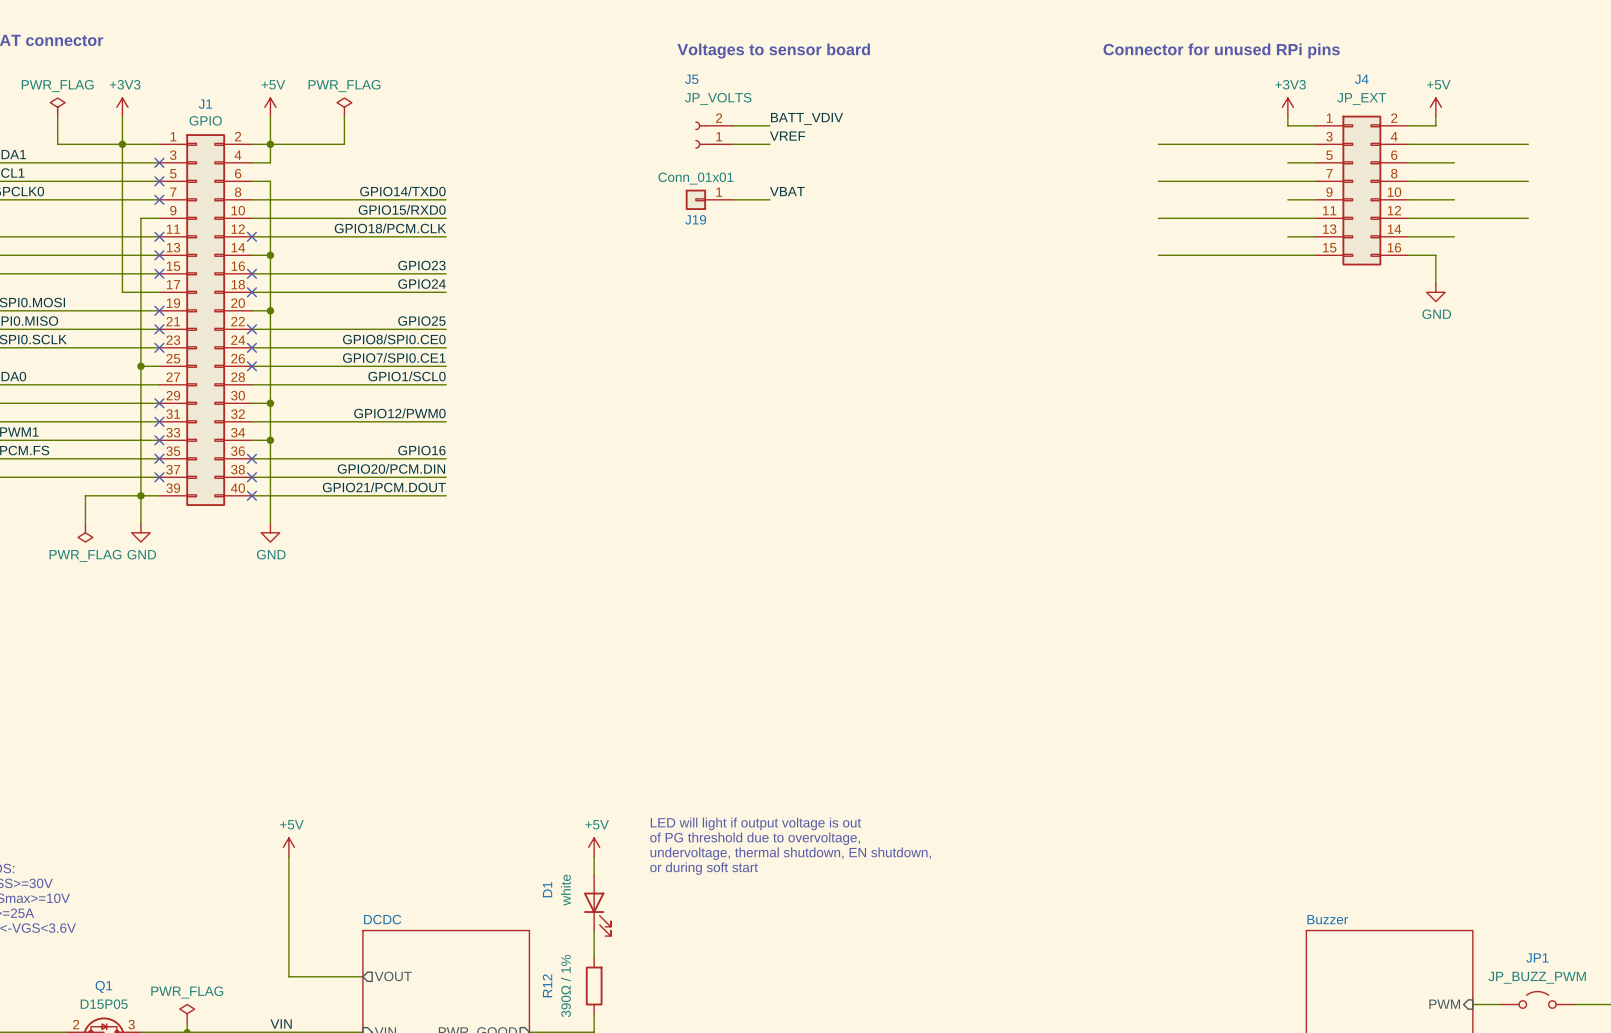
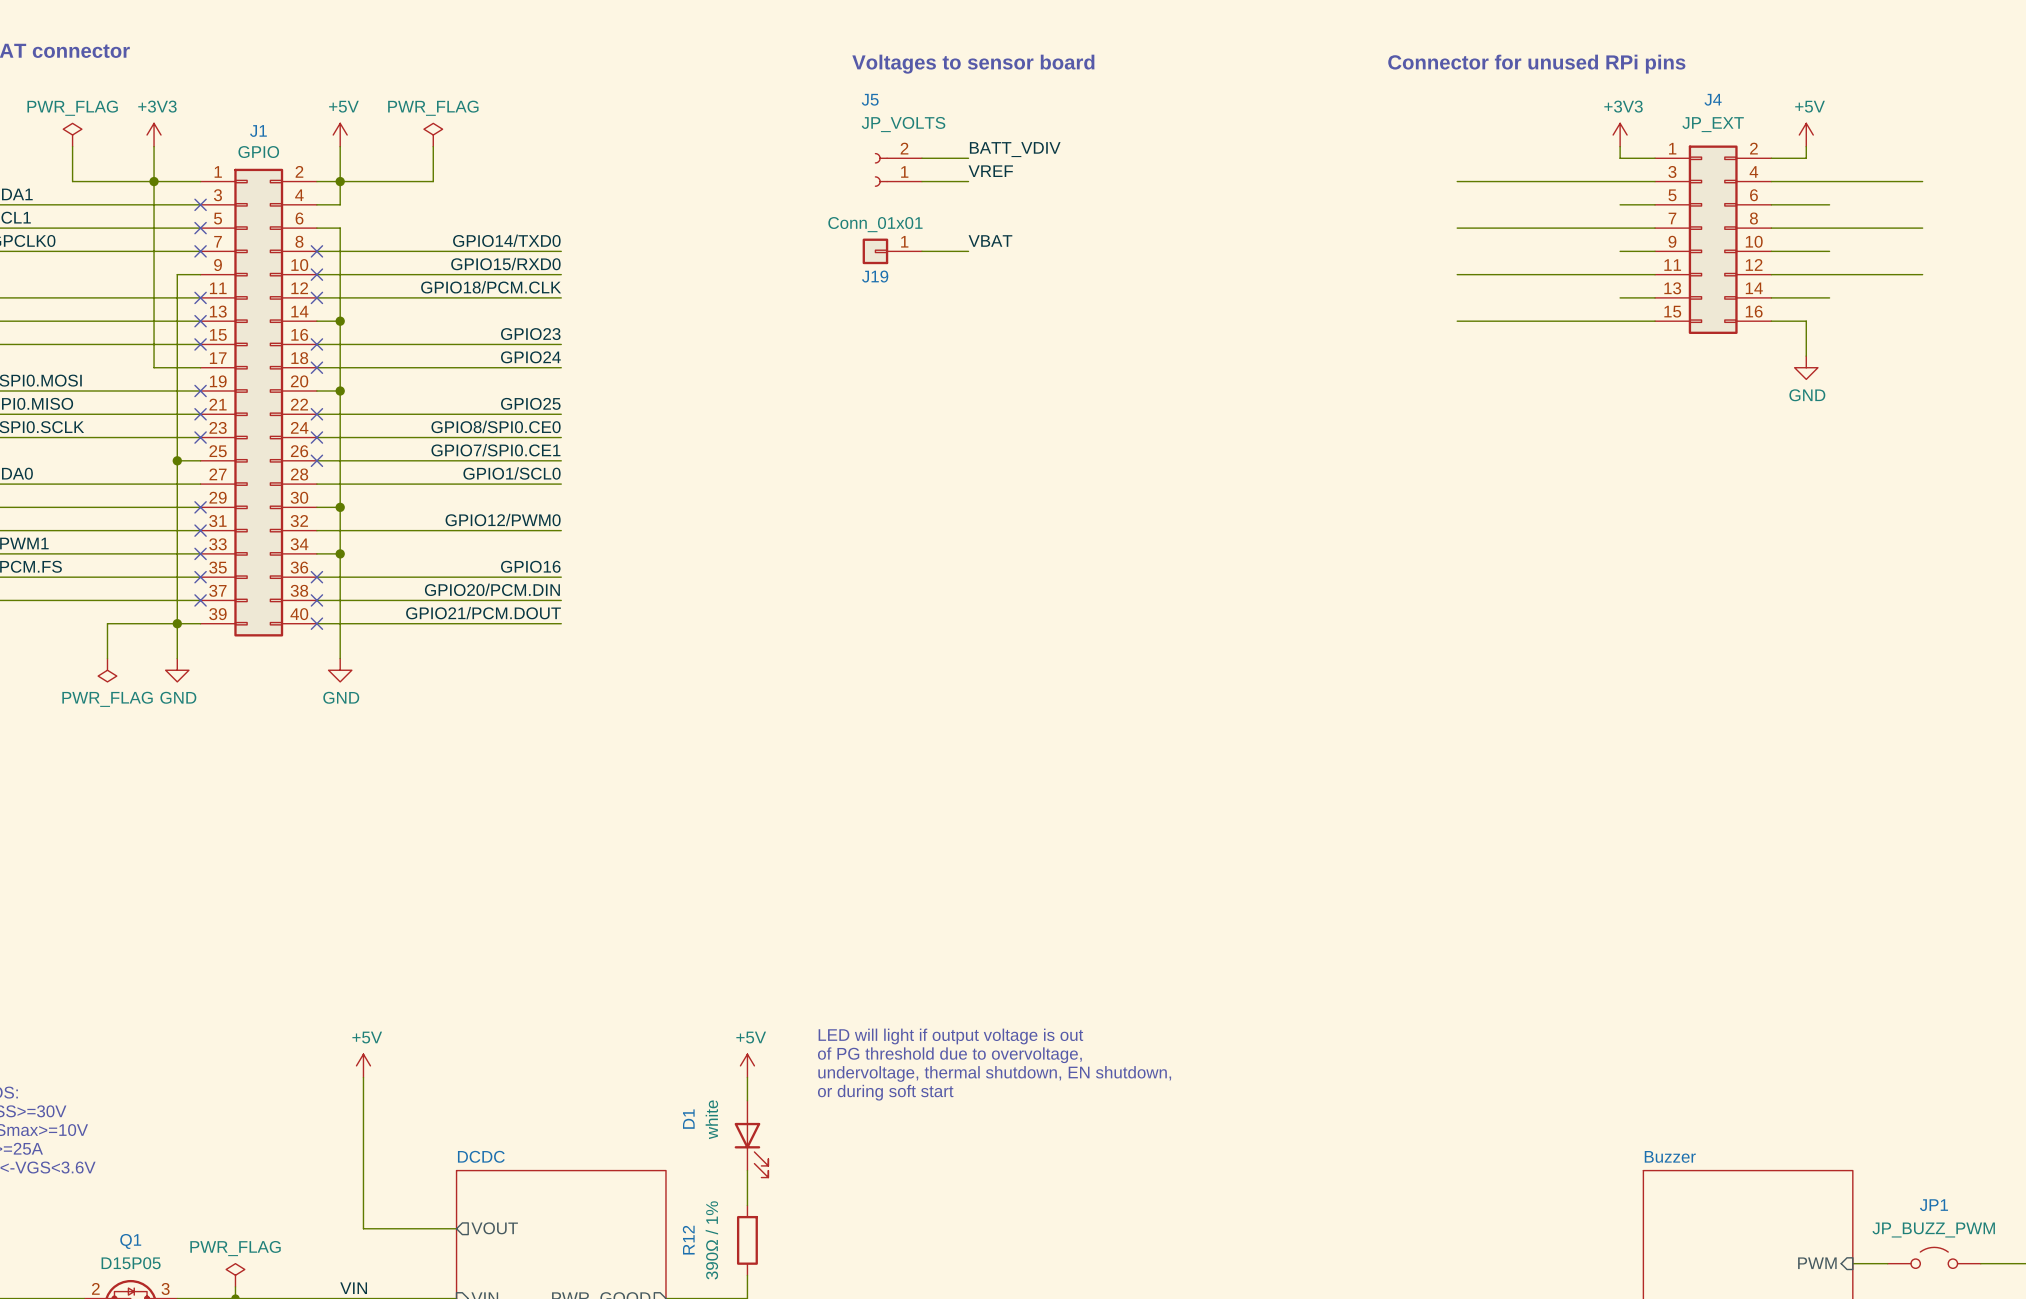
no-connect mark: none -> (316, 251)
no-connect mark: none -> (316, 274)

